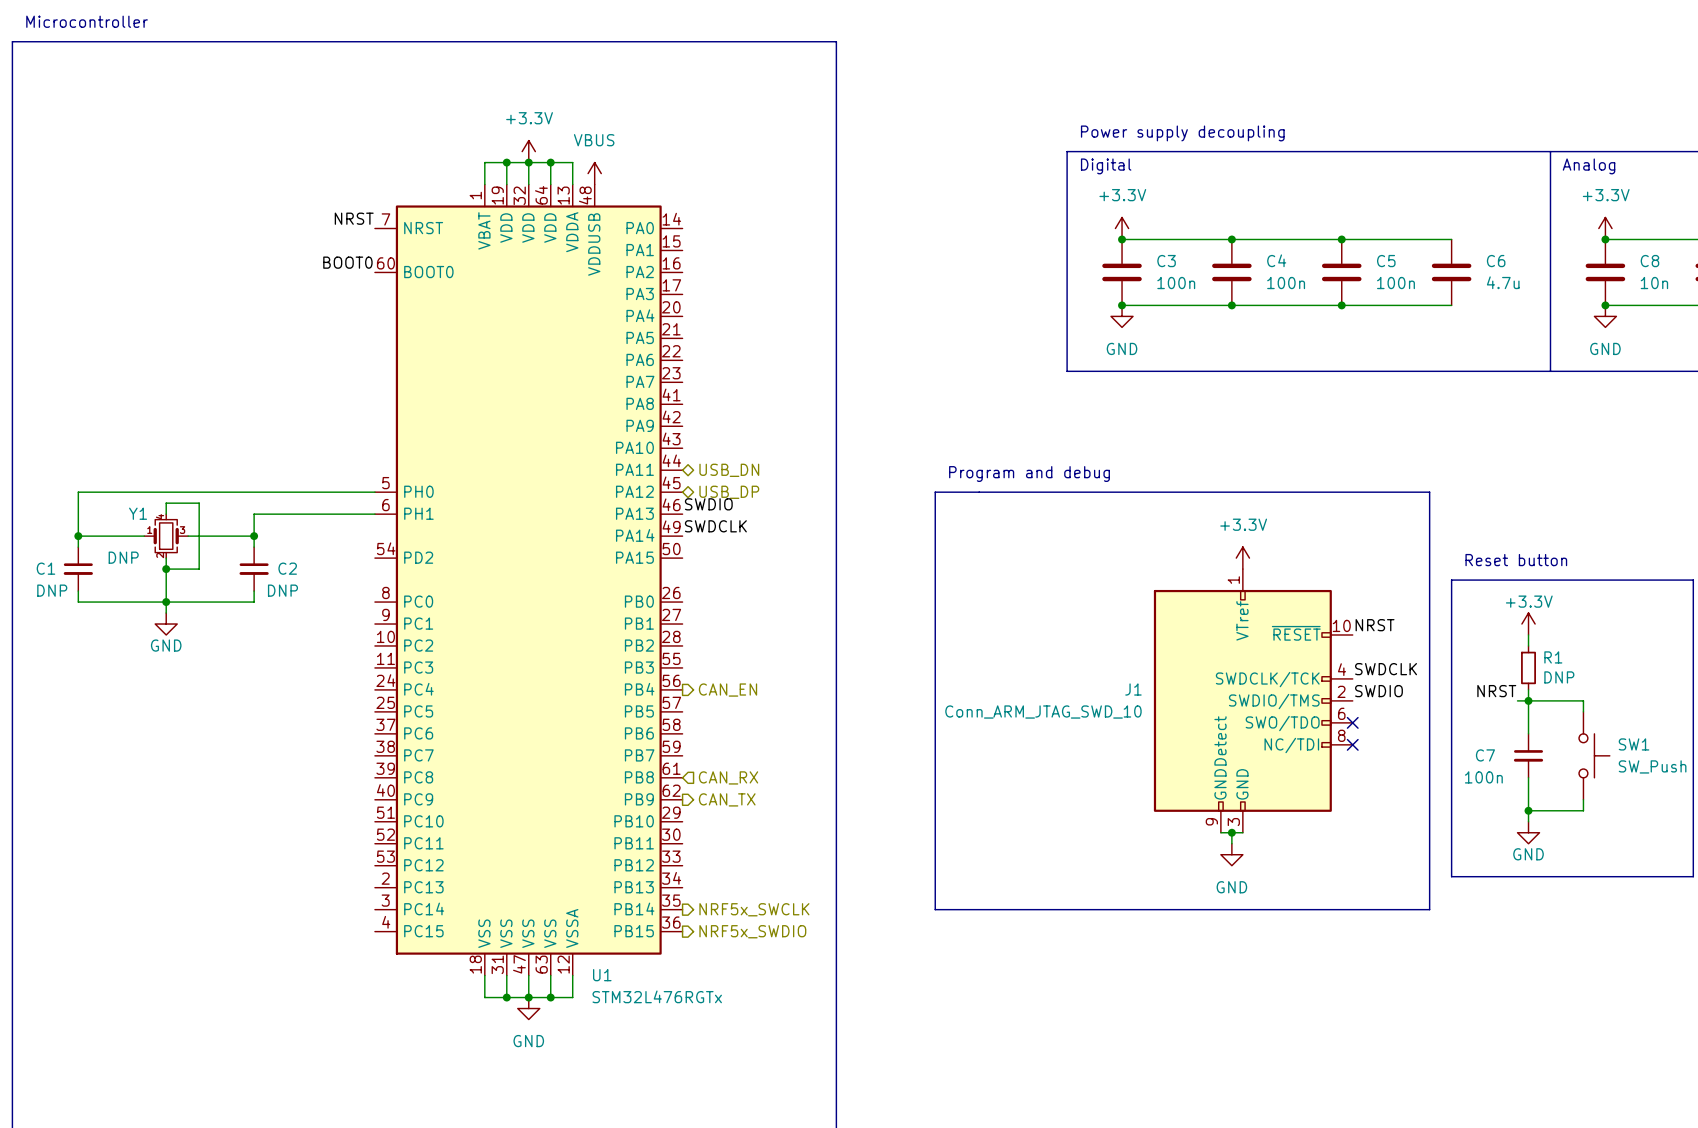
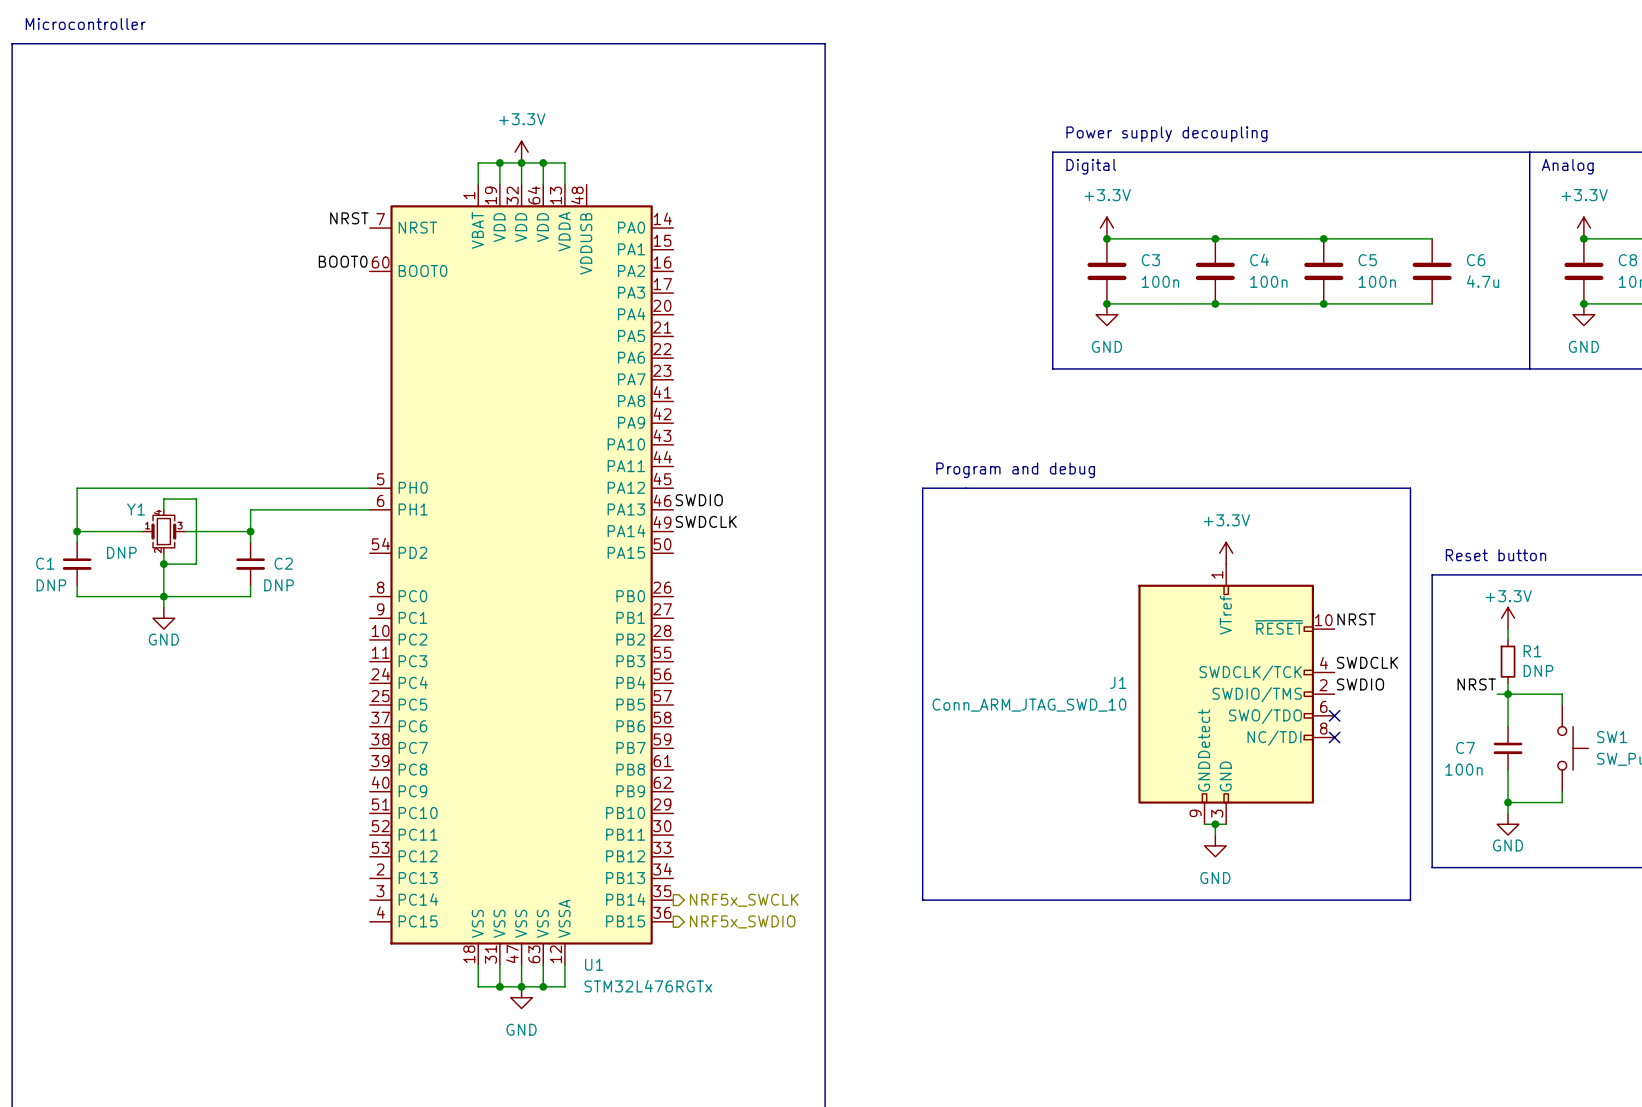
power symbol: VBUS (594, 173) -> none
hierarchical label: USB_DN (729, 470) -> none
hierarchical label: USB_DP (729, 492) -> none
hierarchical label: CAN_EN (727, 690) -> none
hierarchical label: CAN_RX (728, 777) -> none
hierarchical label: CAN_TX (727, 799) -> none

